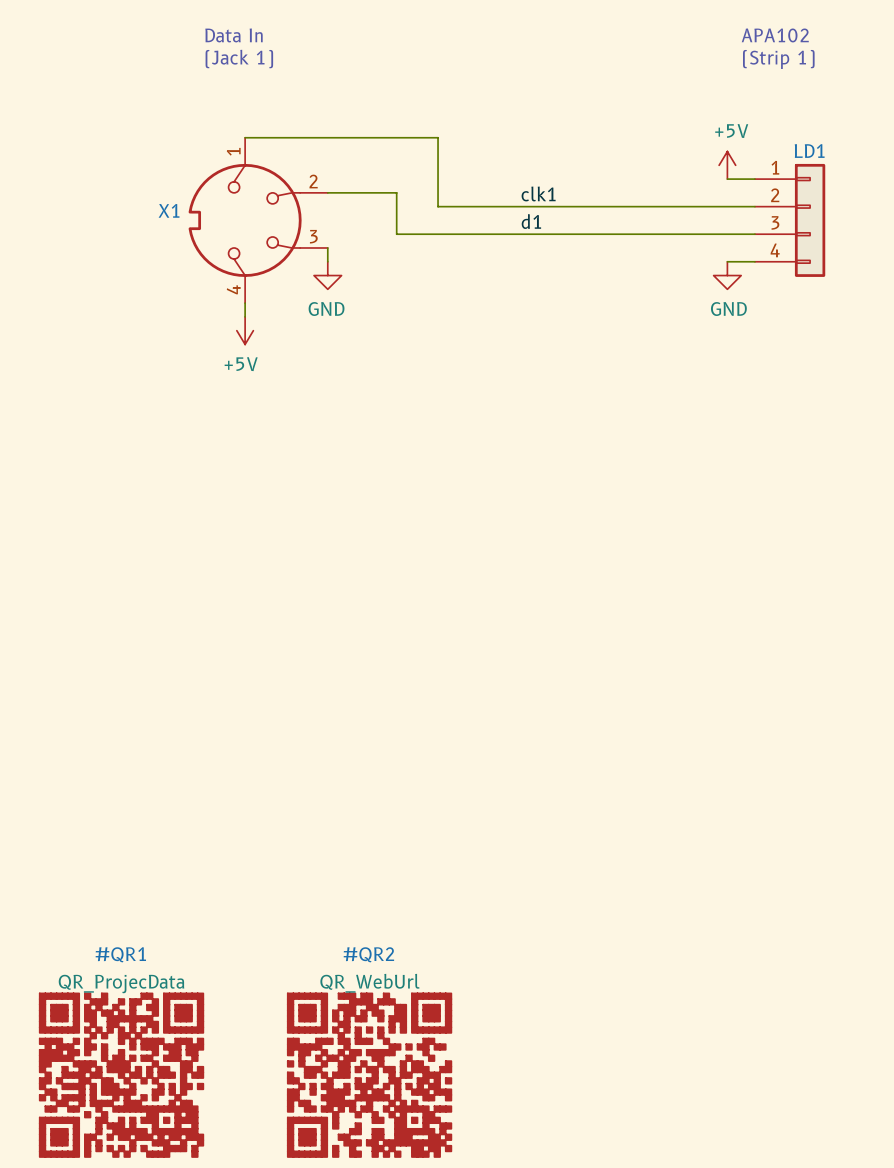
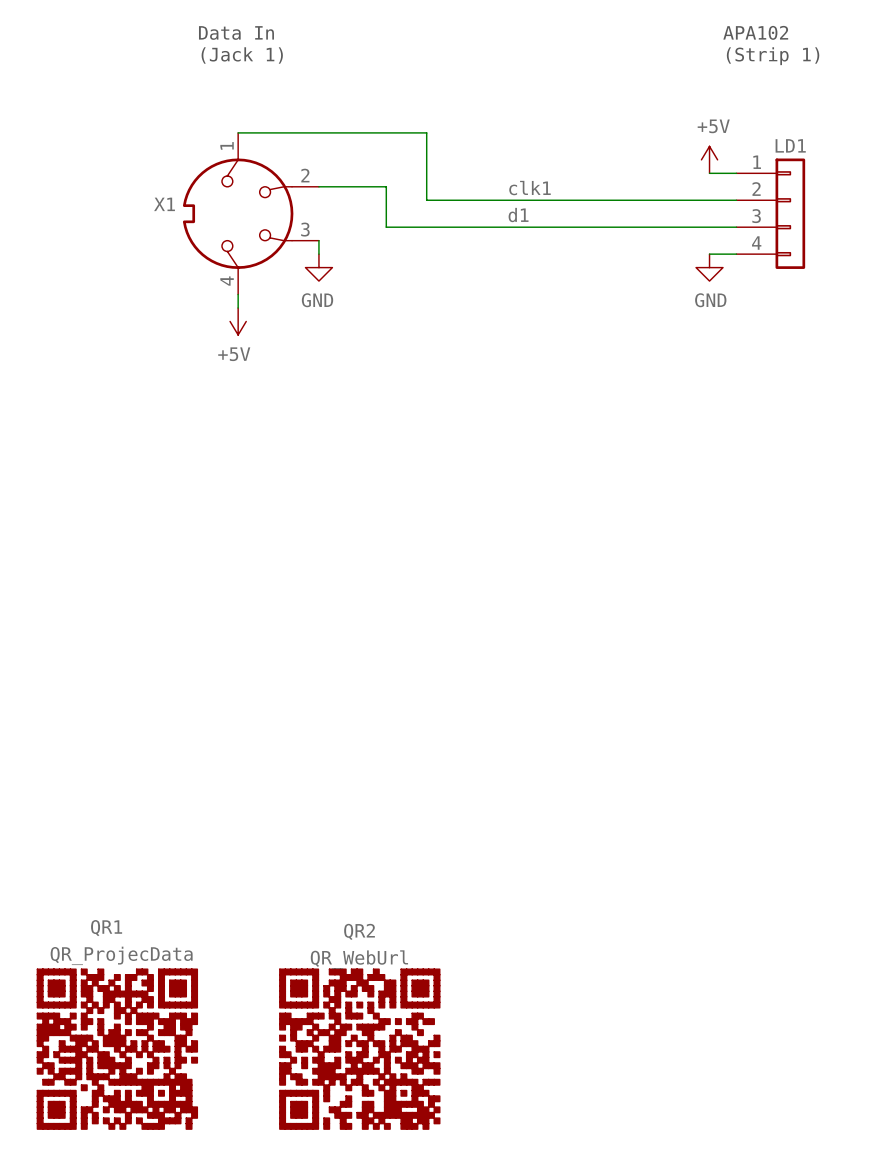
#QR1: QR_ProjecData (121, 1075) -> none
QR1: none -> QR_ProjecData (117, 1049)
#QR2: QR_WebUrl (369, 1075) -> none
QR2: none -> QR_WebUrl (359, 1049)

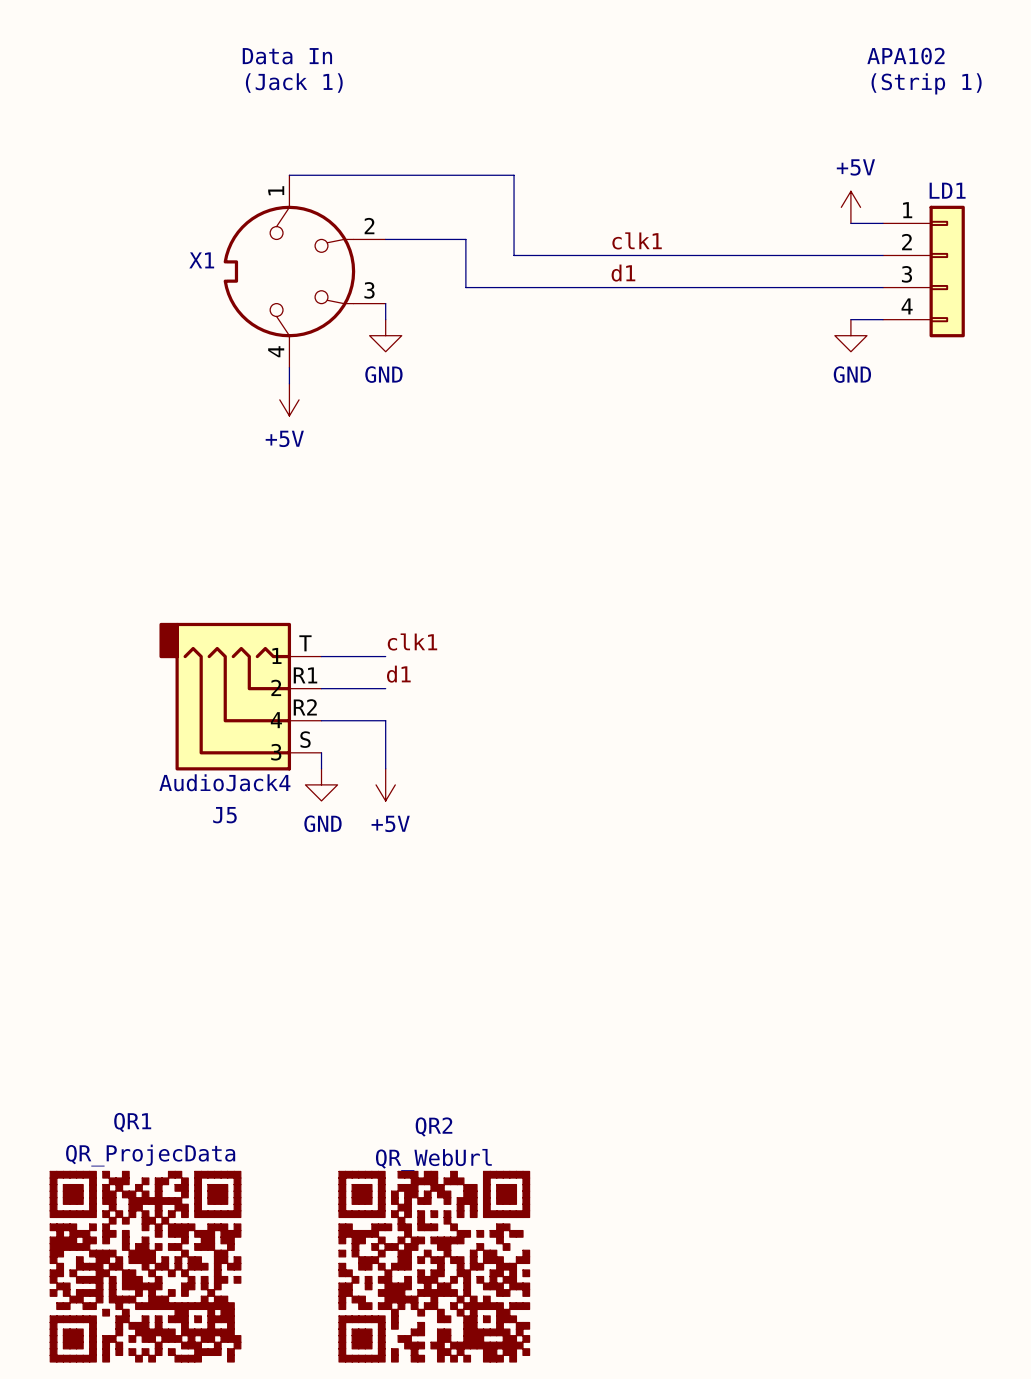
label: none -> clk1 (412, 642)
wire: none -> (321, 656) (385, 656)
label: none -> d1 (398, 674)
wire: none -> (321, 688) (385, 688)
J5: none -> AudioJack4 (240, 696)
wire: none -> (321, 720) (385, 720) (385, 768)
wire: none -> (321, 752) (321, 768)
power symbol: none -> GND (321, 784)
power symbol: none -> +5V (385, 784)

